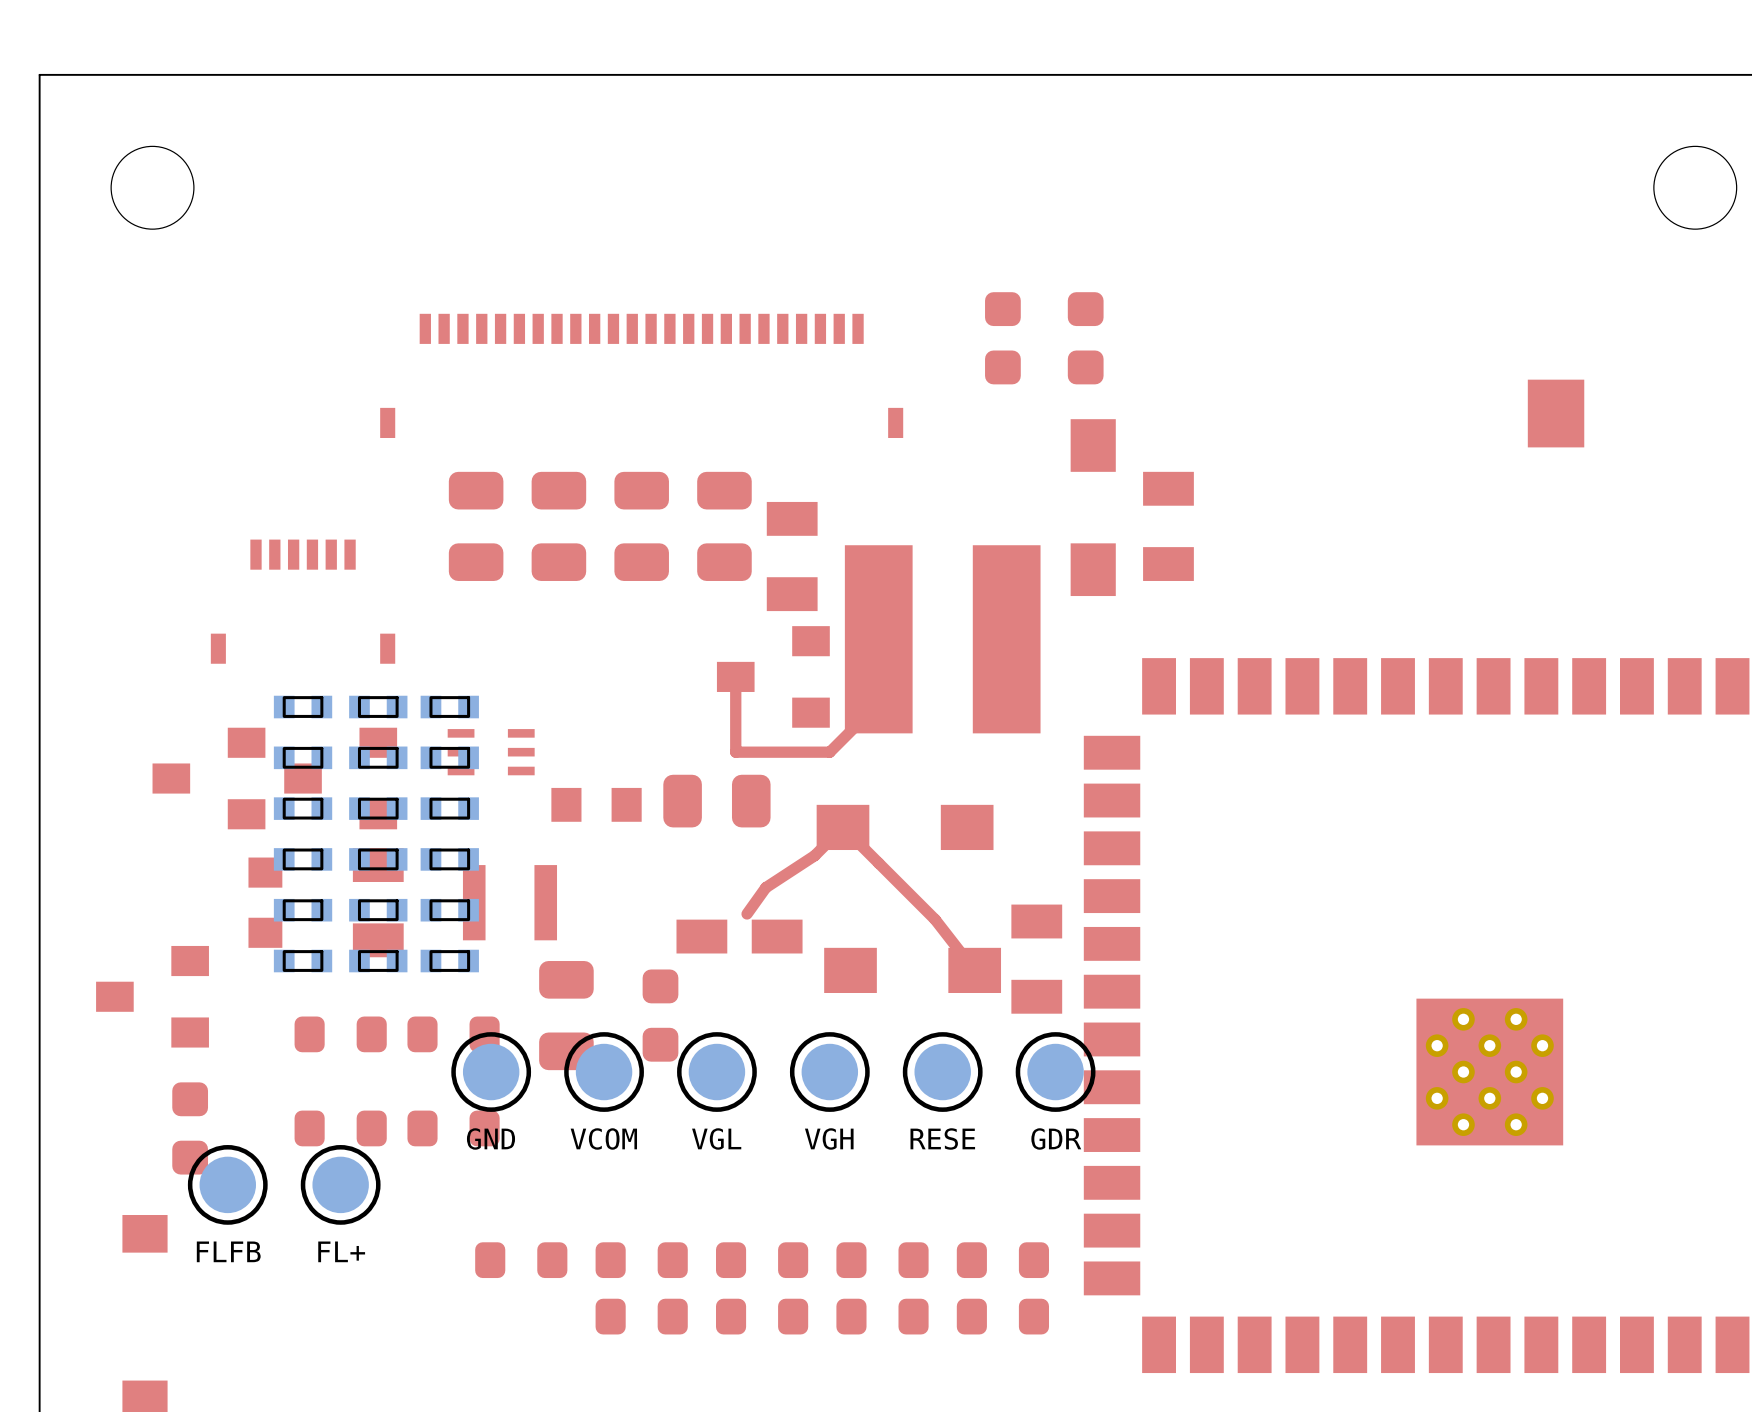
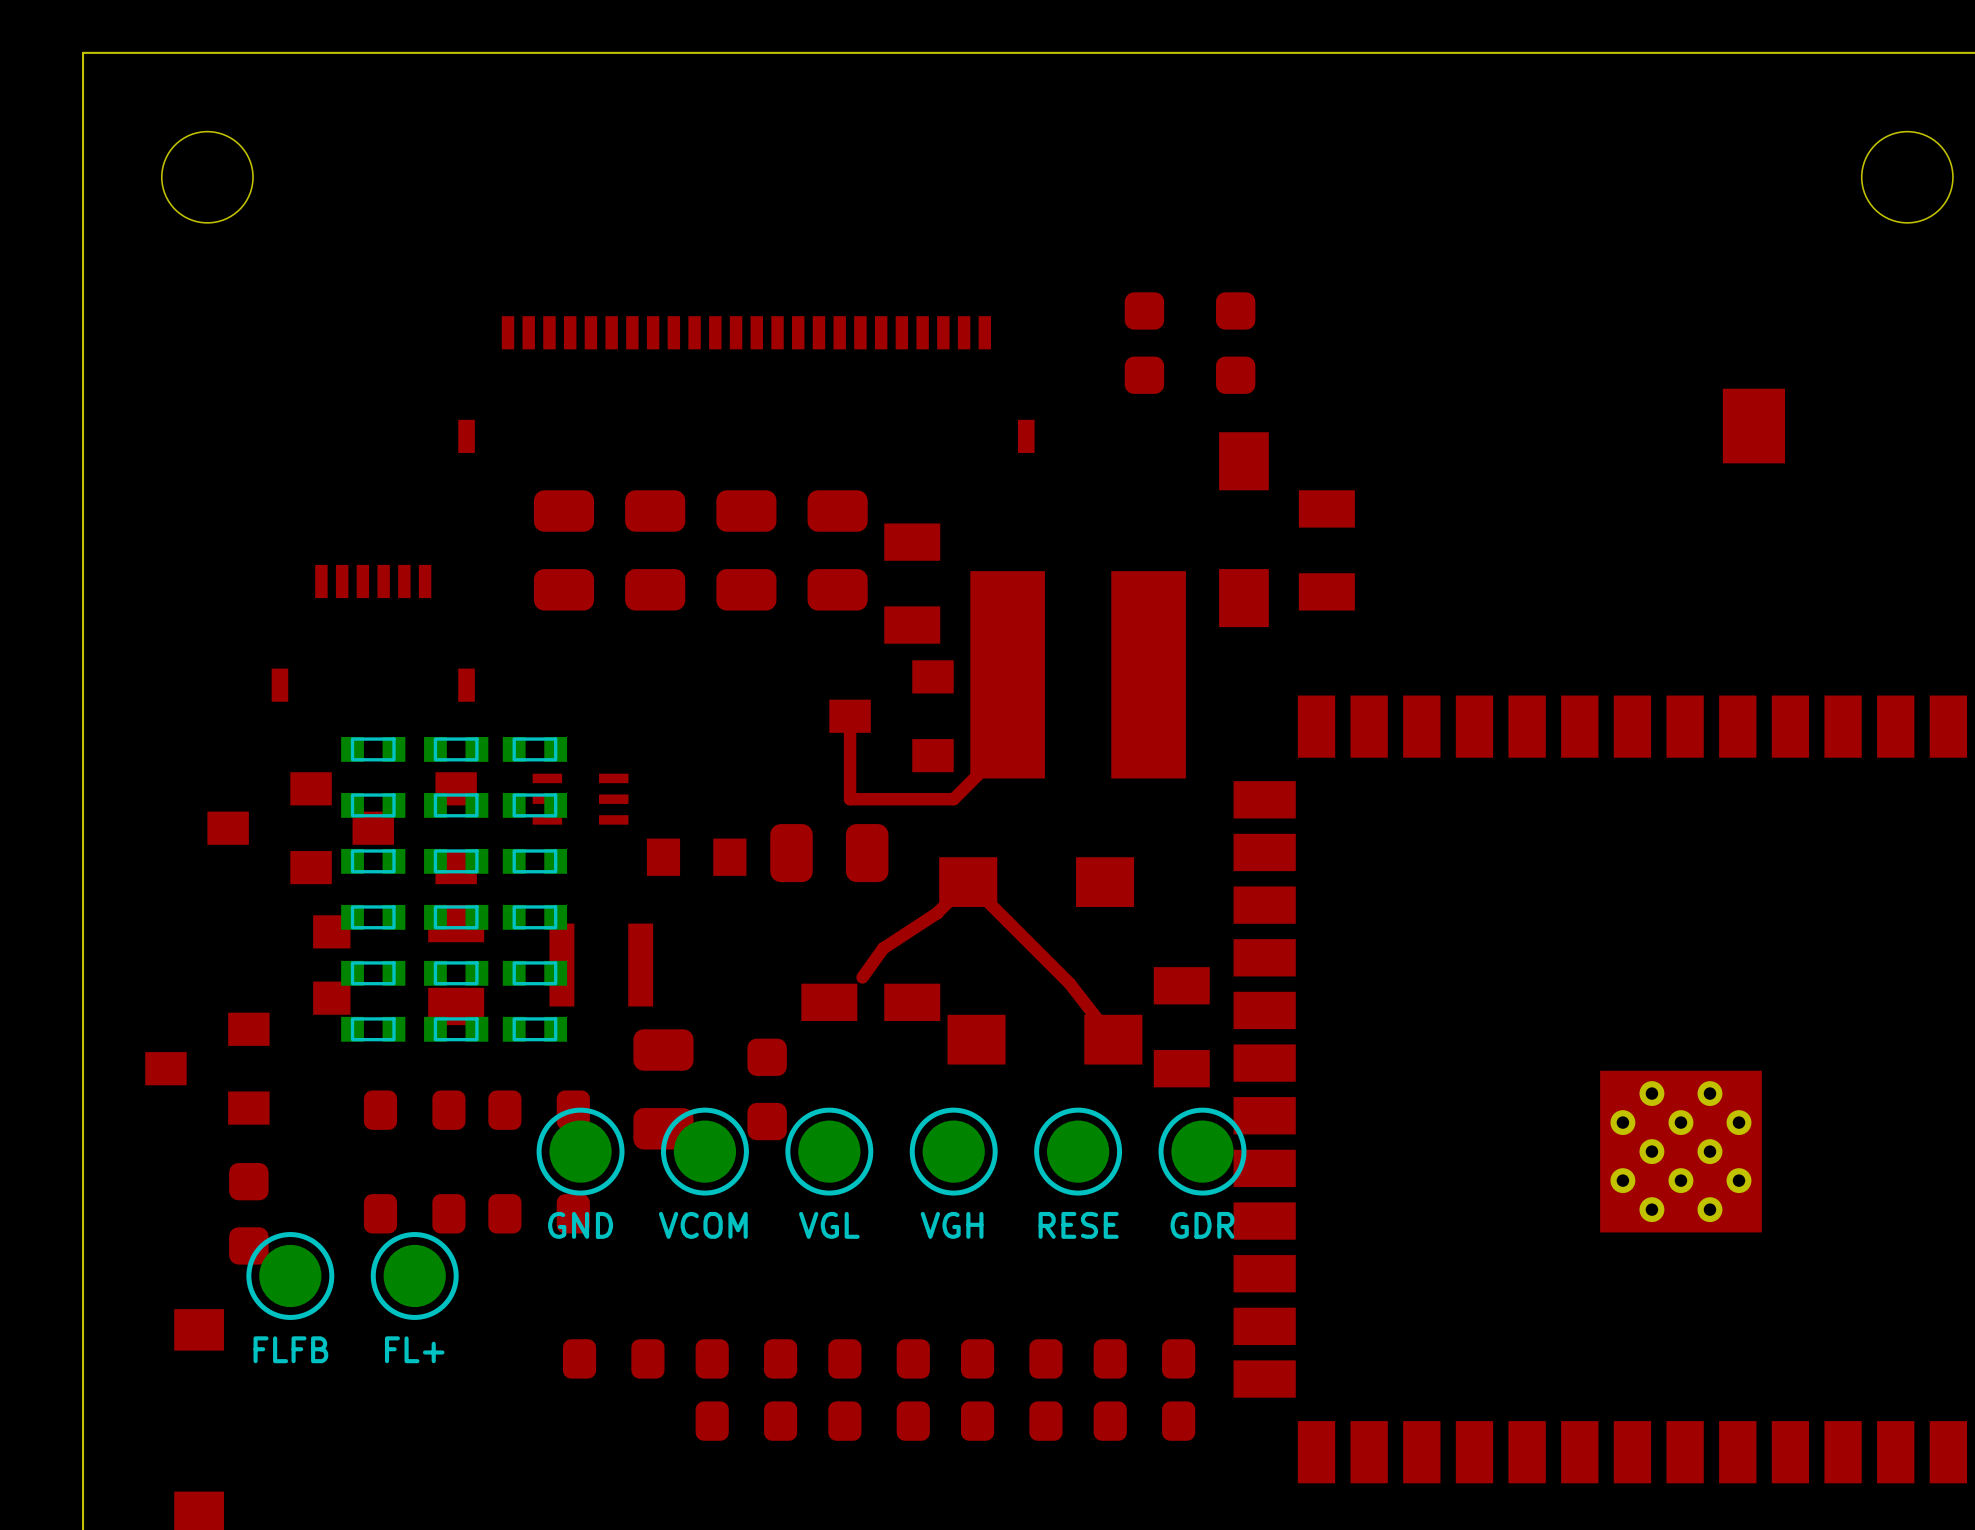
part position: (739, 936) -> (870, 1002)

